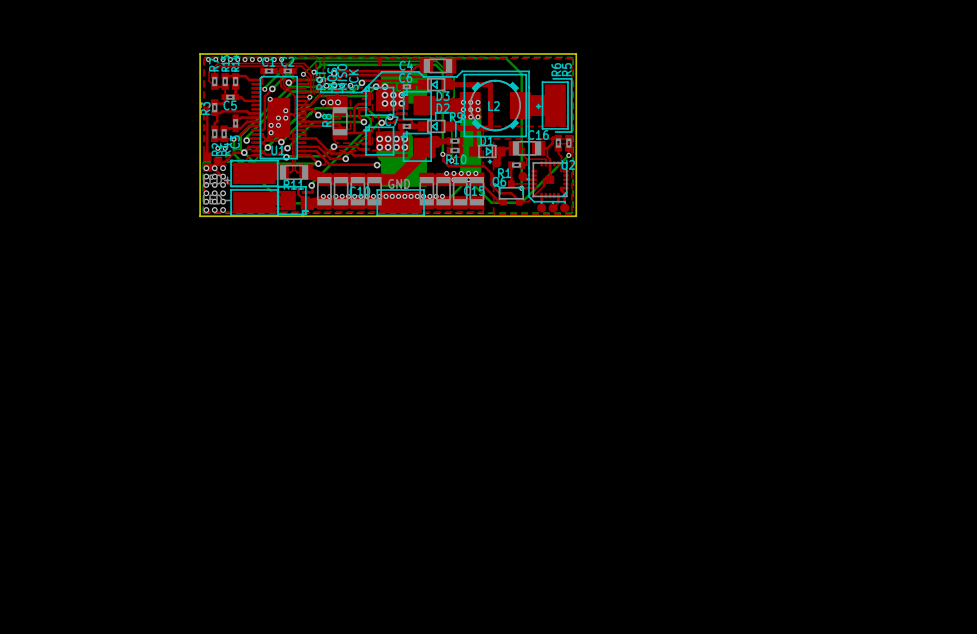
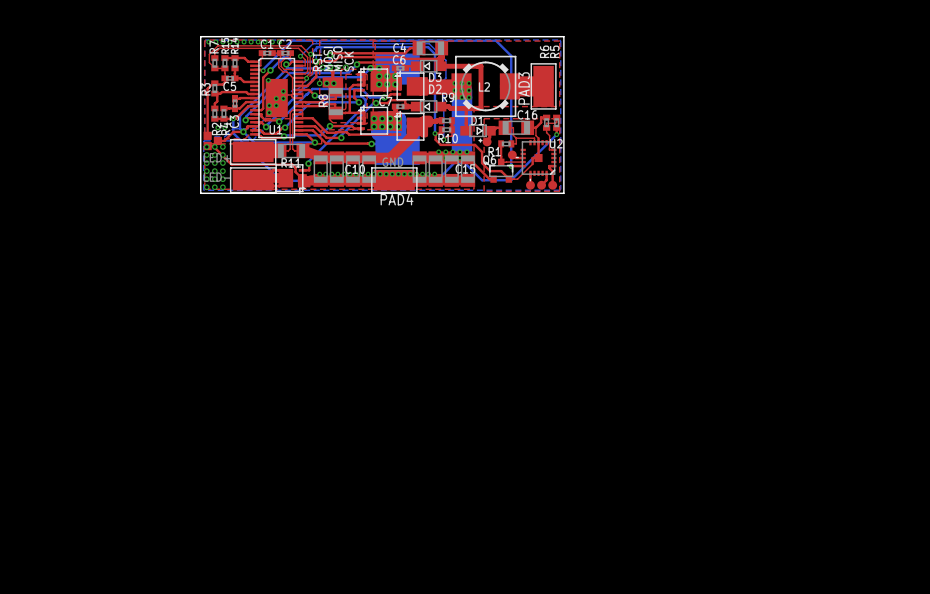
line: (553, 78) (571, 78) (571, 132) (555, 132) -> none
line: (320, 90) (320, 92) (361, 92) (382, 71) (418, 71) (423, 76) (456, 76) (462, 71) (529, 71) (529, 196) (534, 201) (565, 201) (565, 203) -> none
line: (331, 90) (331, 92) -> none
line: (342, 90) (342, 92) -> none
line: (353, 90) (353, 92) -> none
line: (538, 104) (538, 108) -> none
line: (536, 106) (540, 106) -> none
PAD3 name: none -> PAD3 (524, 88)
line: (447, 112) (435, 112) (435, 119) -> none
line: (461, 122) (455, 122) (455, 137) -> none
line: (553, 201) (553, 203) -> none
PAD4 name: none -> PAD4 (397, 199)

